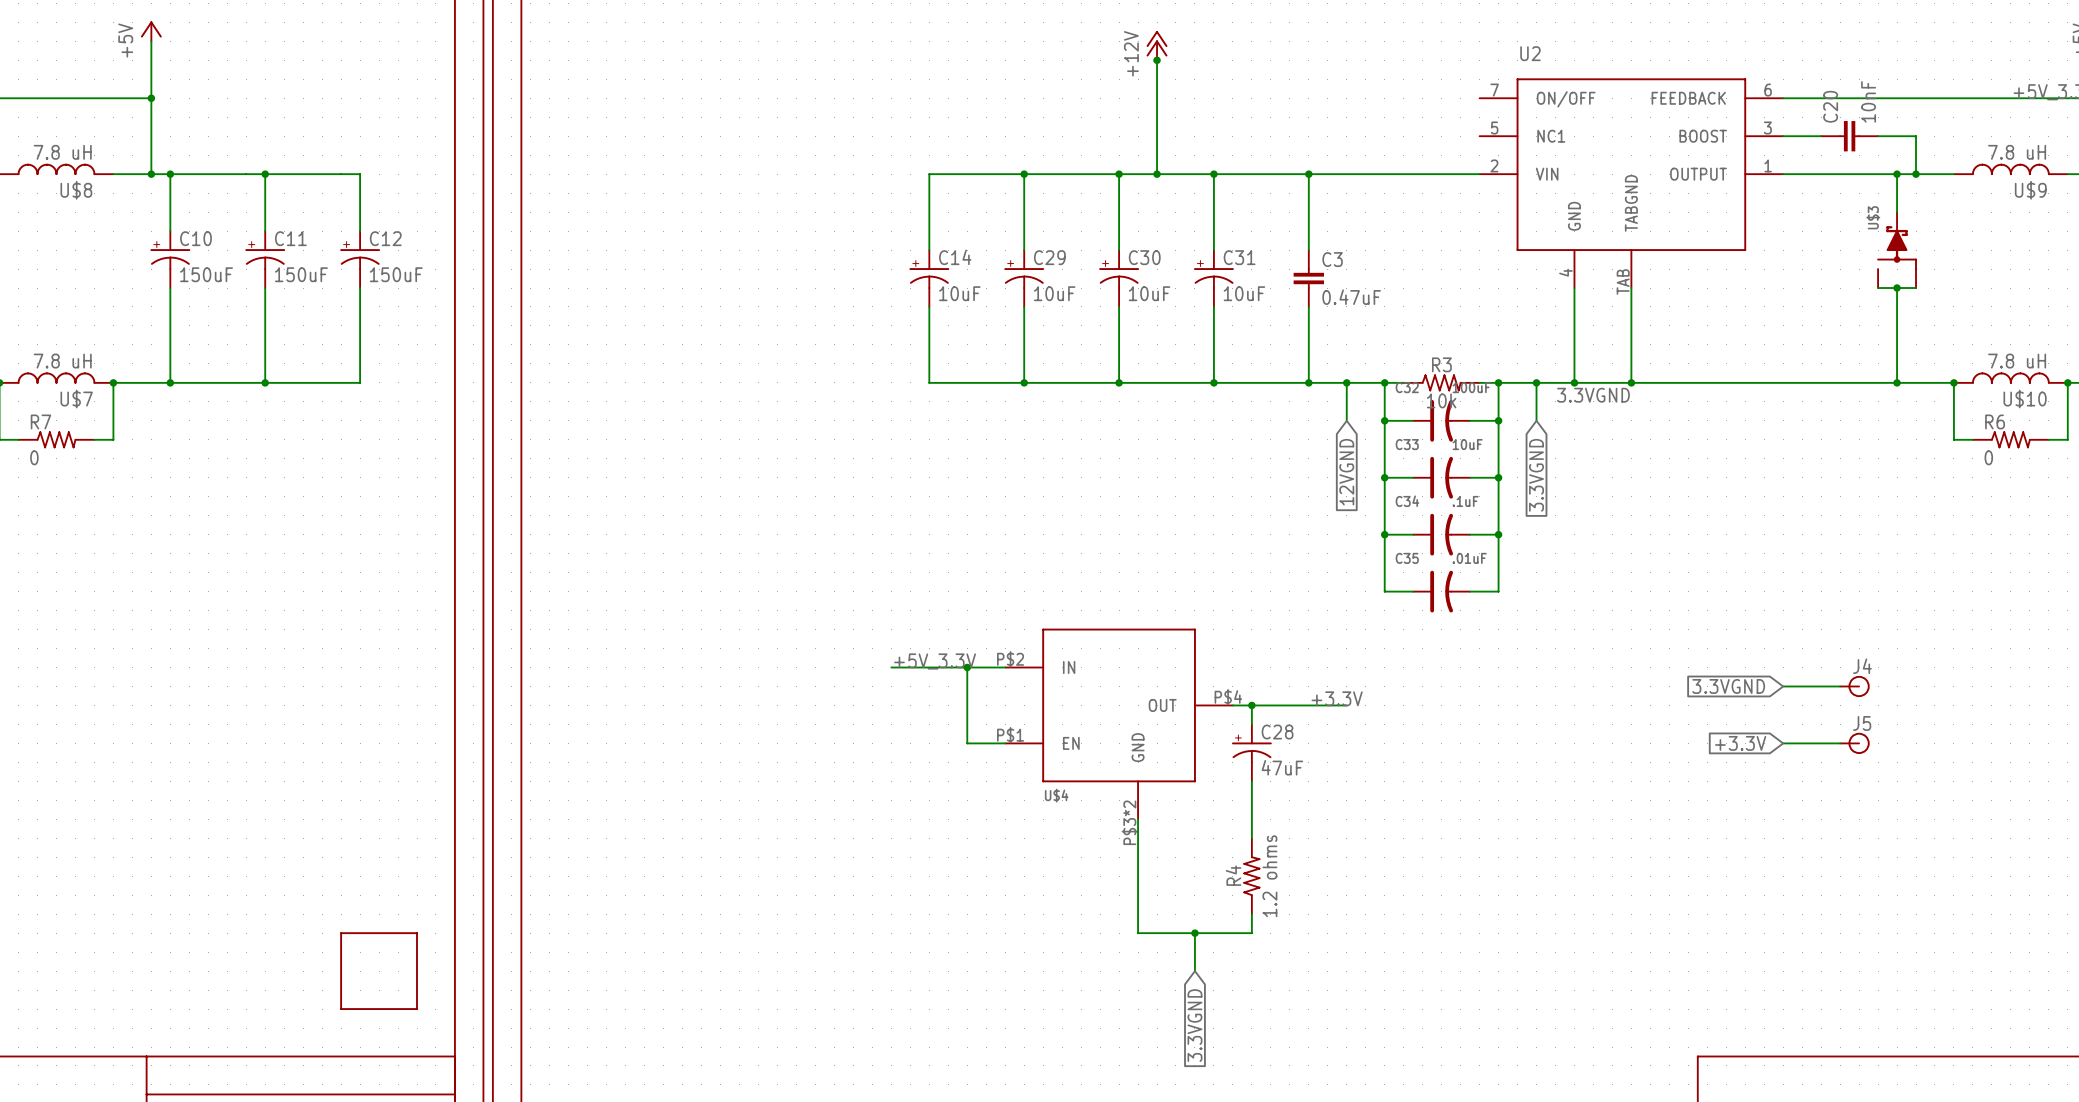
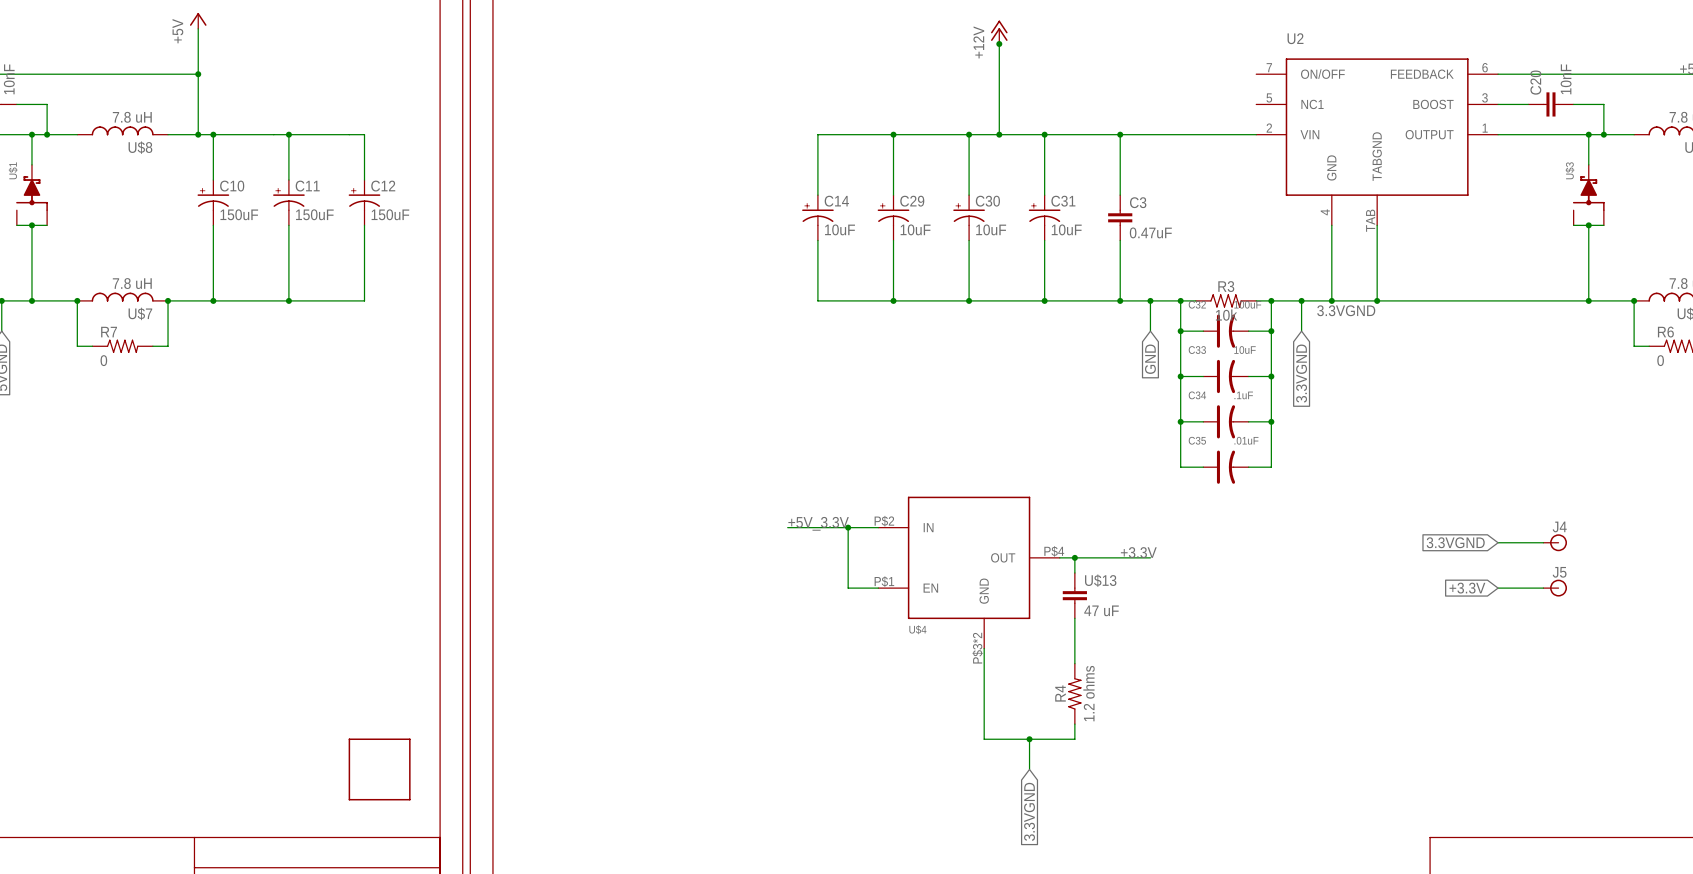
global label: 12VGND (1346, 472) -> GND (1150, 359)
C28: 47uF (1251, 752) -> none
U$13: none -> 47 uF (1074, 595)

